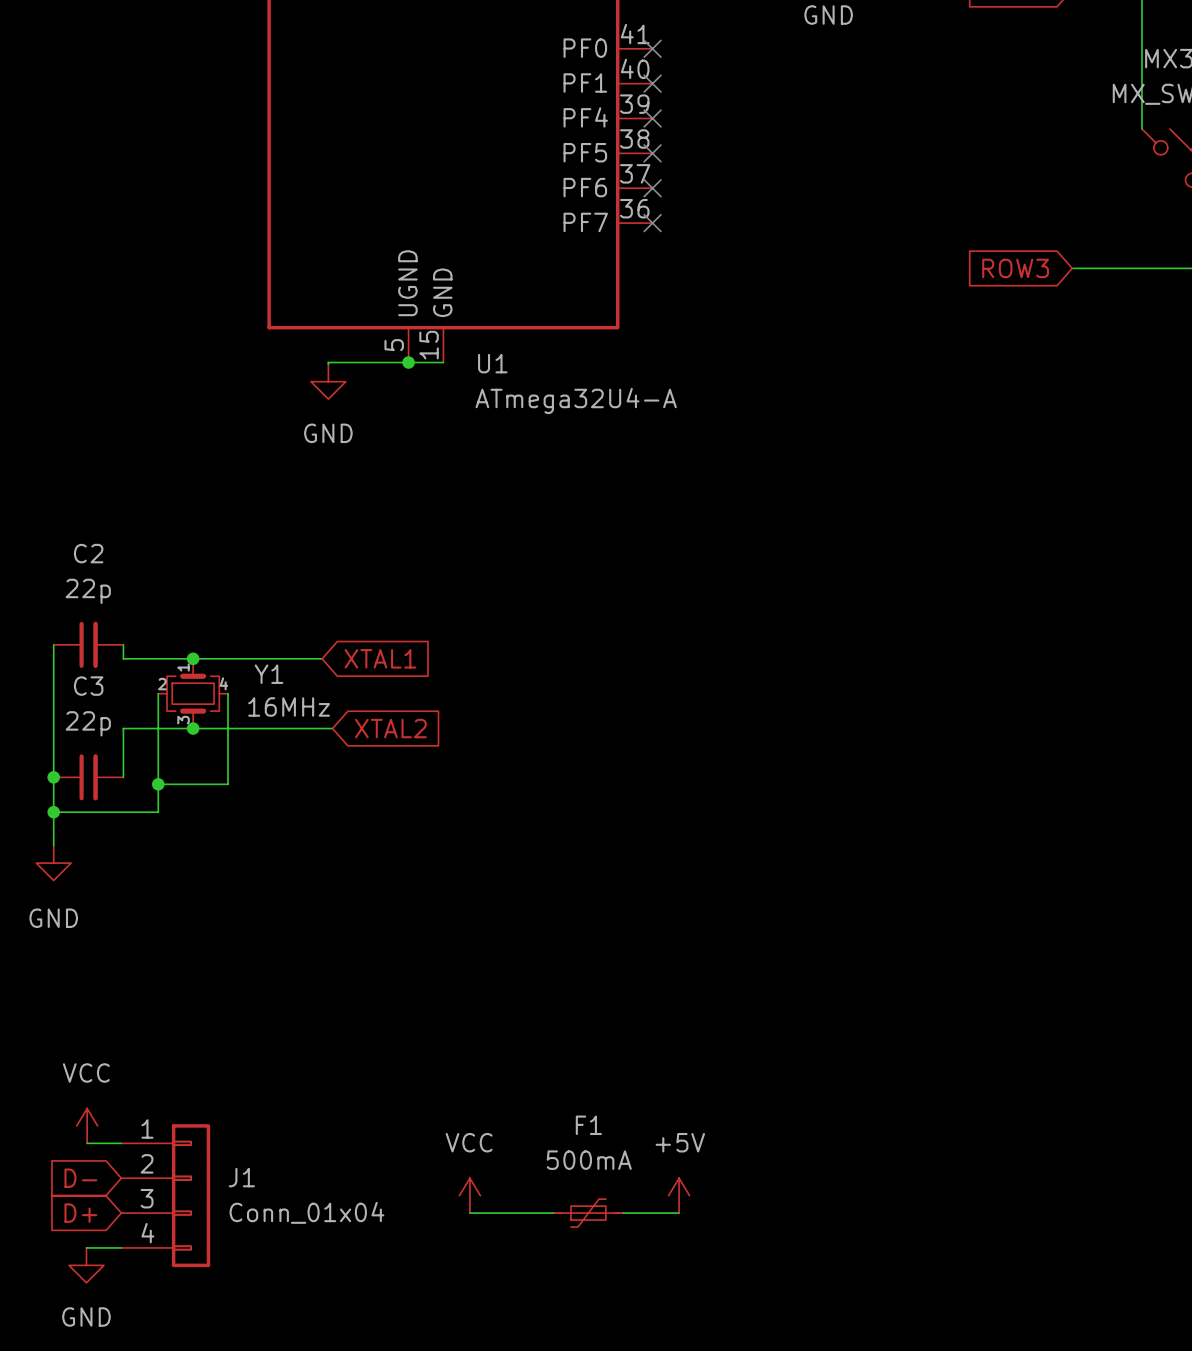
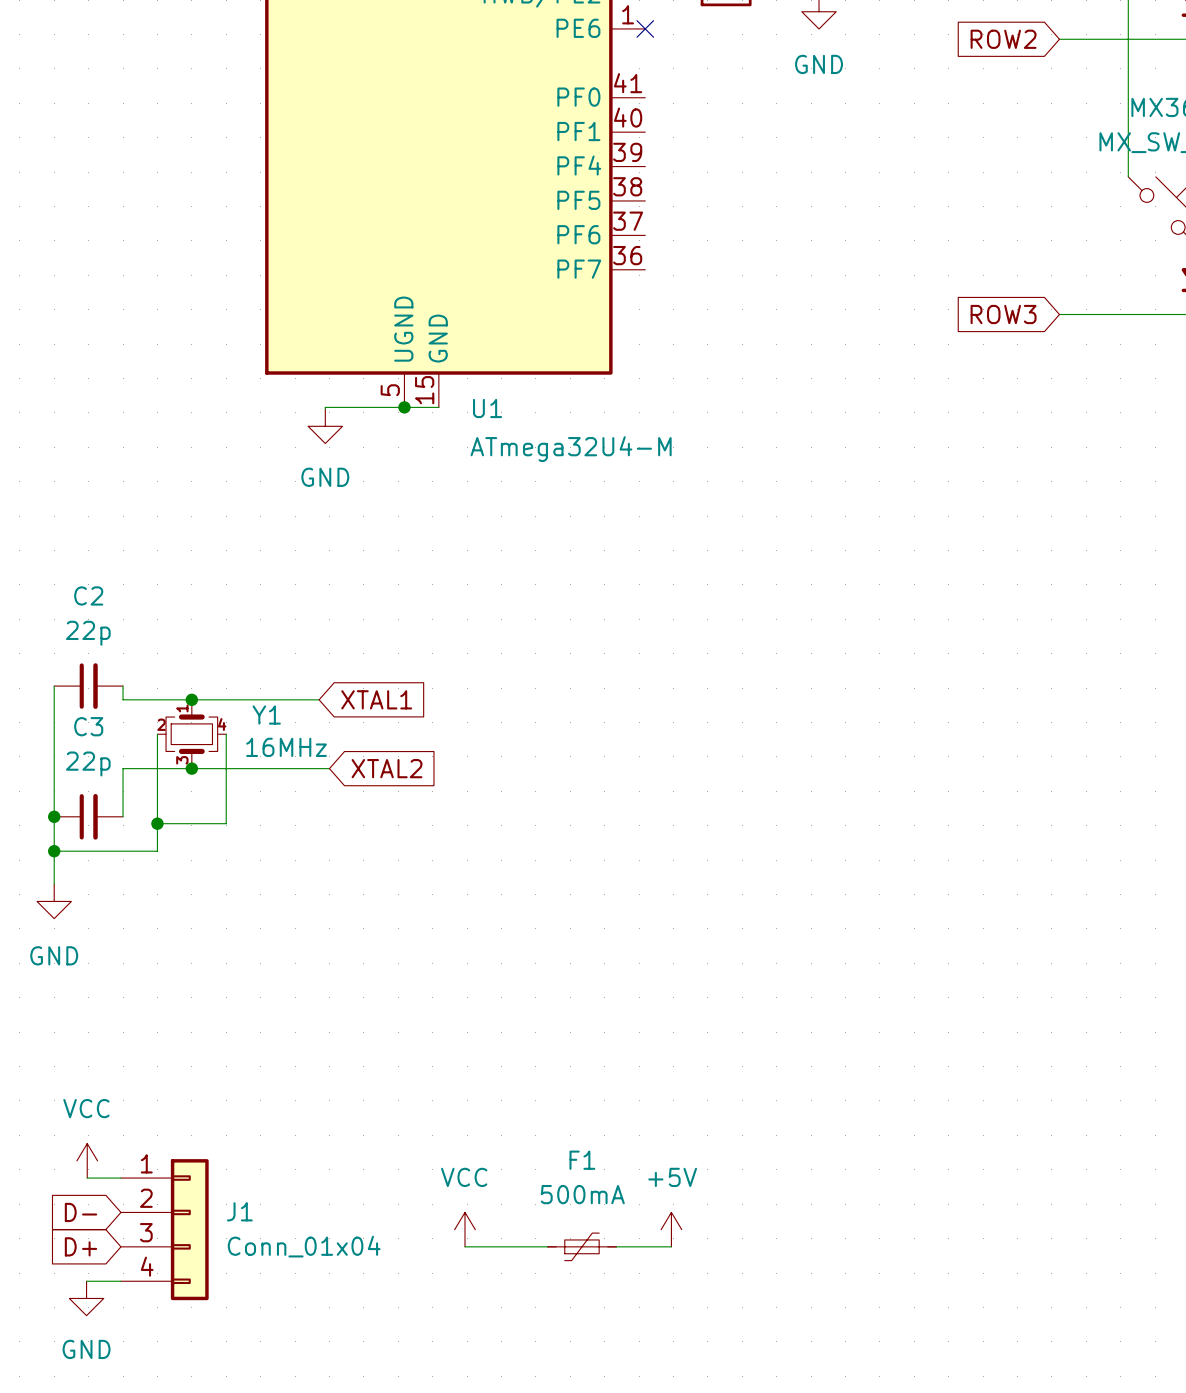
no-connect mark: (652, 48) -> none
no-connect mark: (652, 83) -> none
no-connect mark: (652, 118) -> none
no-connect mark: (652, 153) -> none
no-connect mark: (652, 188) -> none
no-connect mark: (652, 223) -> none
U1 value: ATmega32U4-A (576, 400) -> ATmega32U4-M (571, 449)

